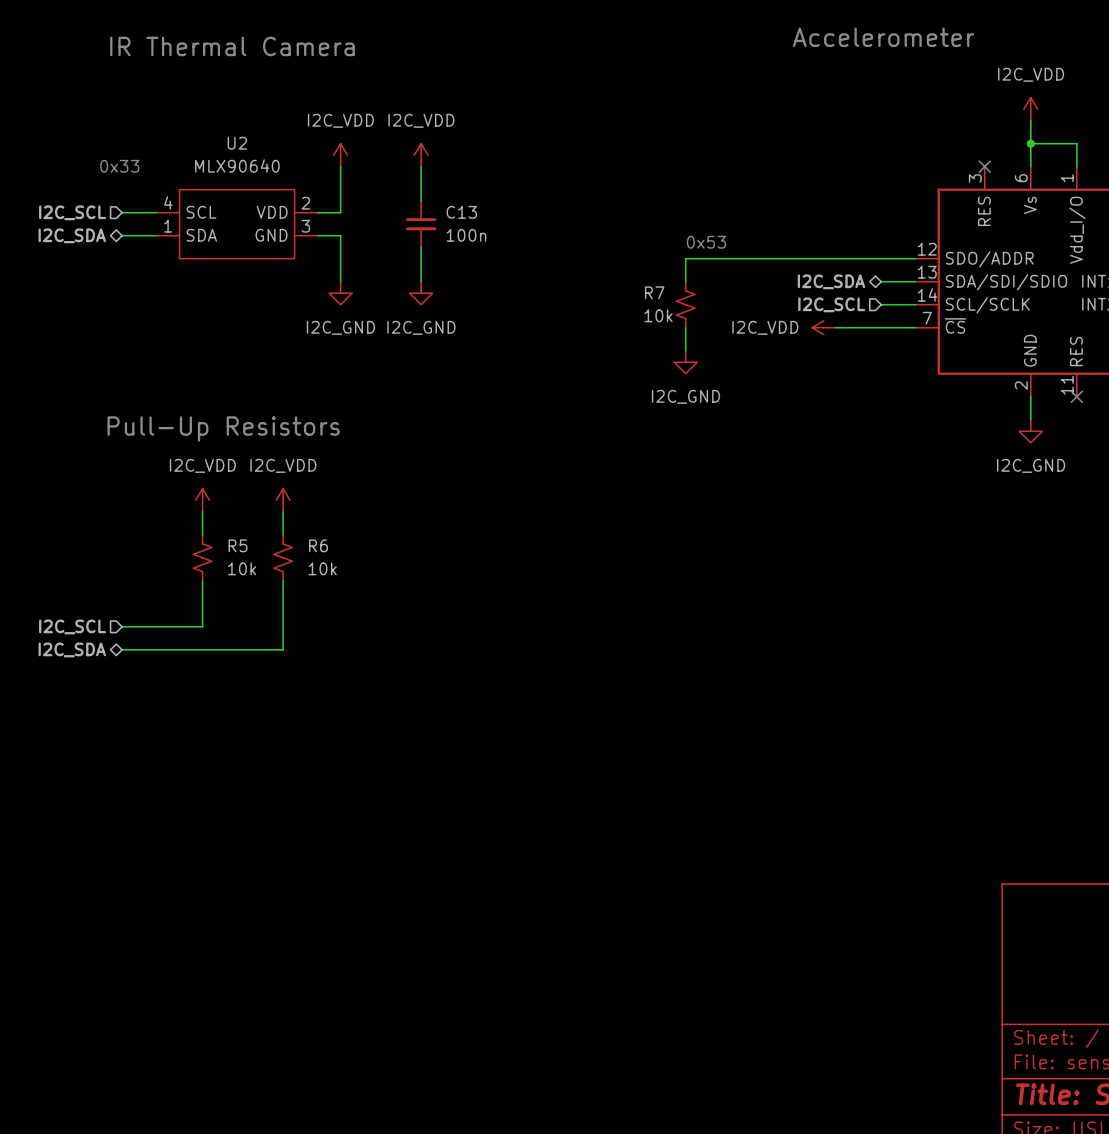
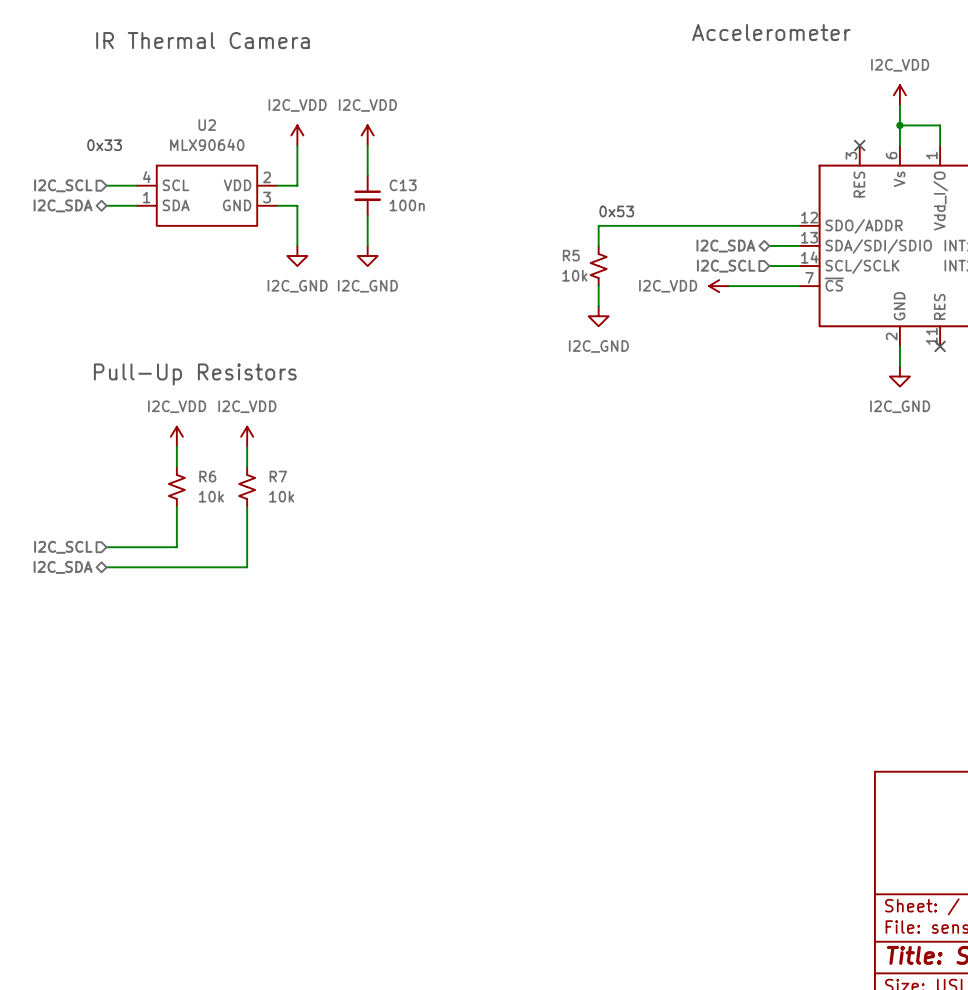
R7 name: R7 (654, 292) -> R5 (571, 255)
R5 name: R5 (238, 545) -> R6 (207, 476)
R6 name: R6 (318, 545) -> R7 (278, 476)

